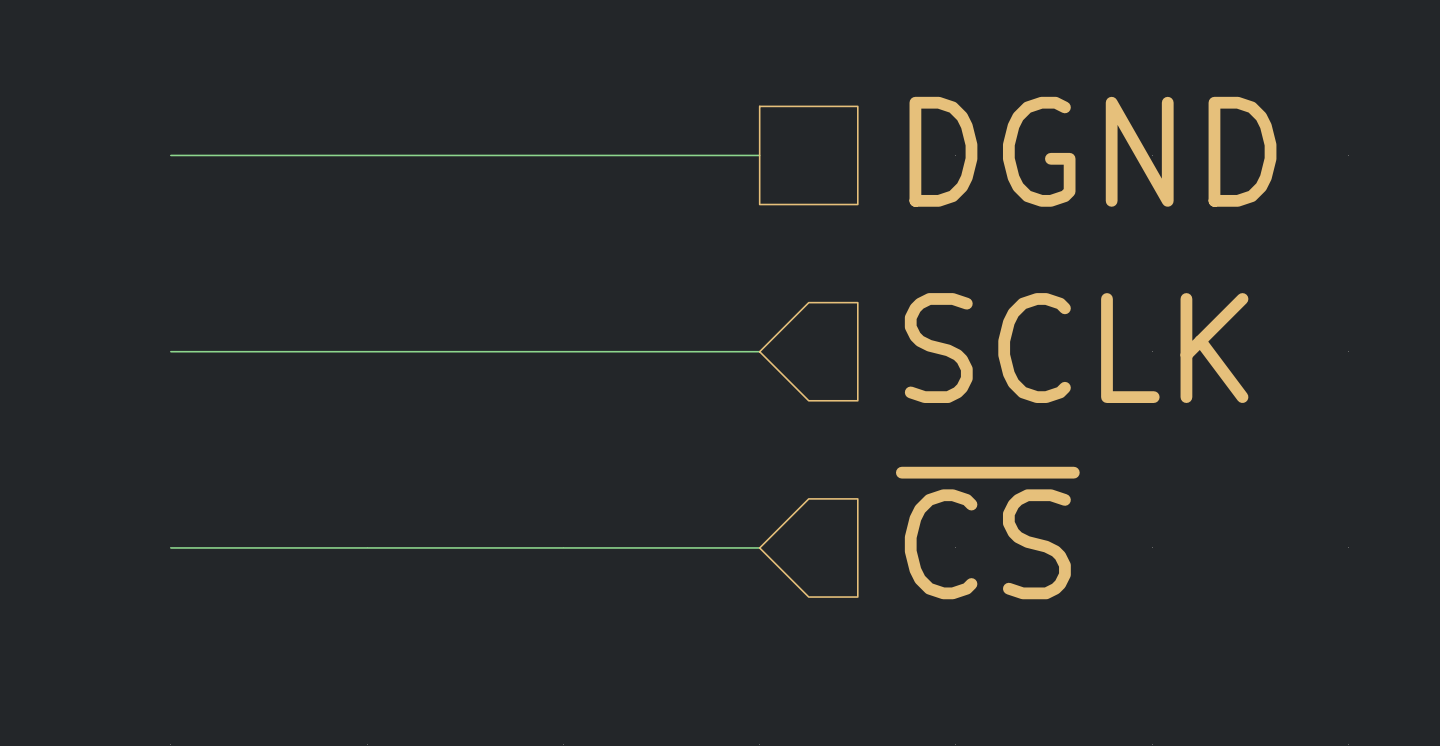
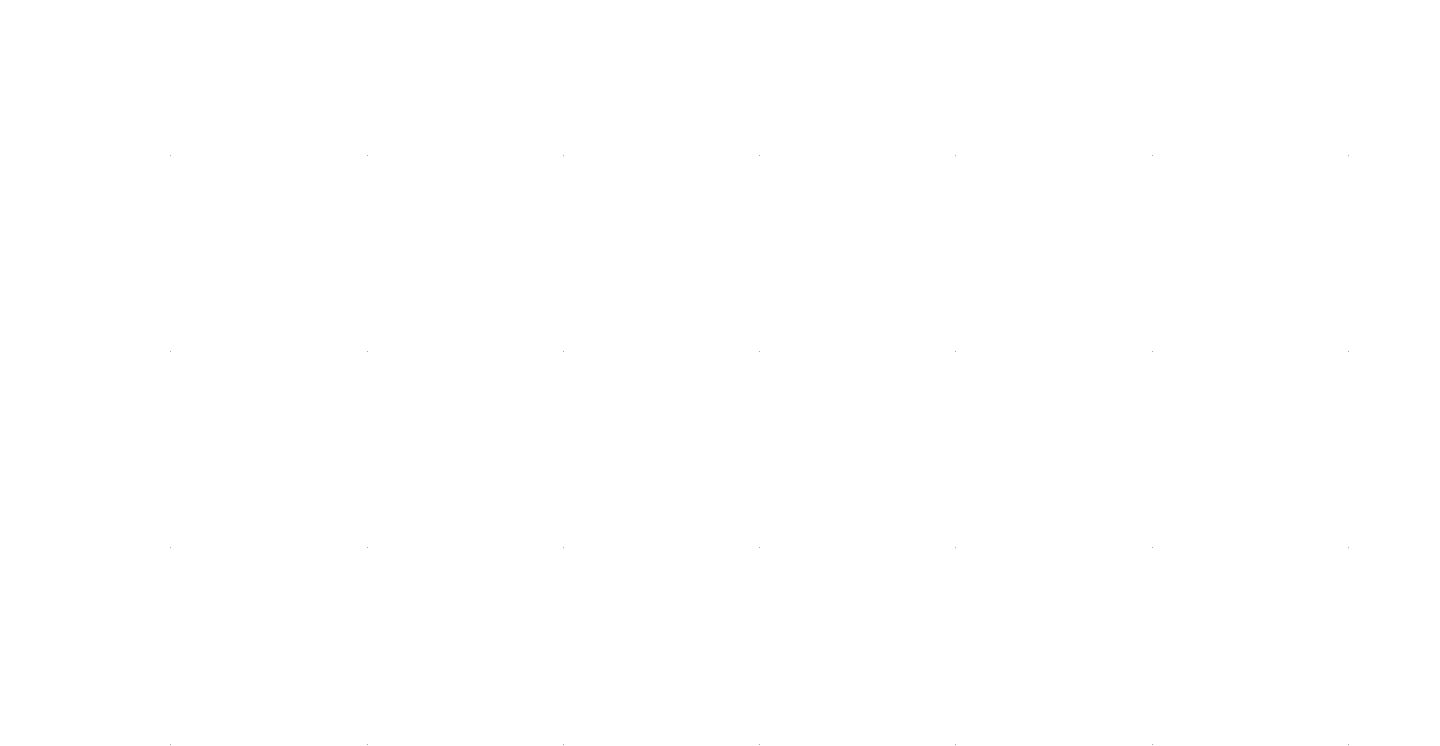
hierarchical label: DGND (1092, 151) -> none
wire: (170, 155) (759, 155) -> none
hierarchical label: SCLK (1076, 348) -> none
wire: (170, 351) (759, 351) -> none
hierarchical label: ~{CS} (987, 533) -> none
wire: (170, 547) (759, 547) -> none

